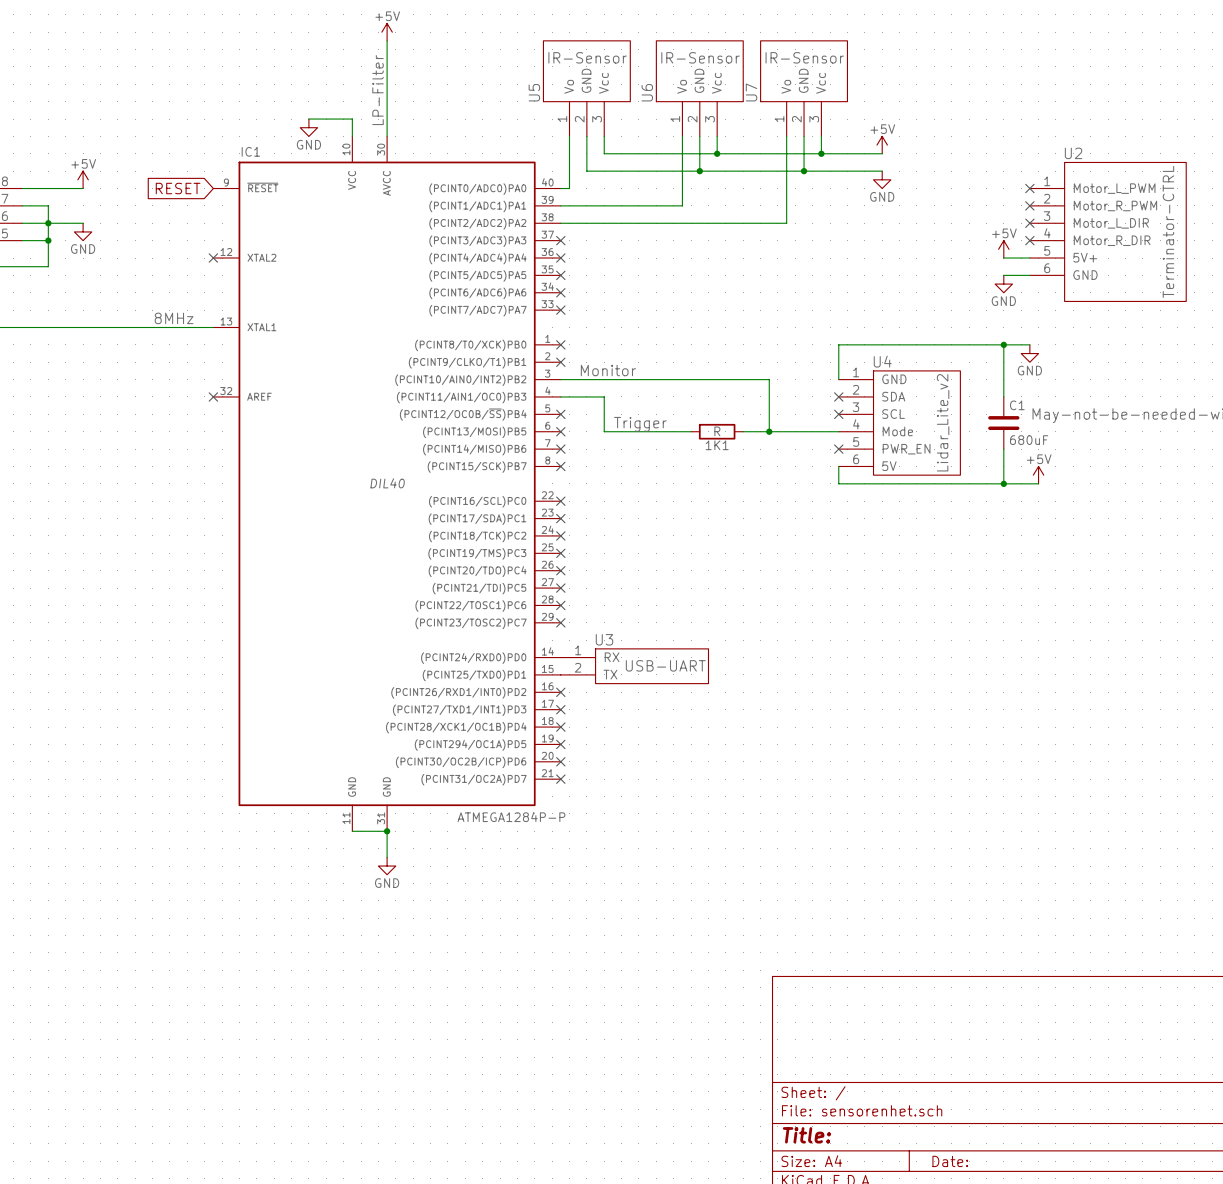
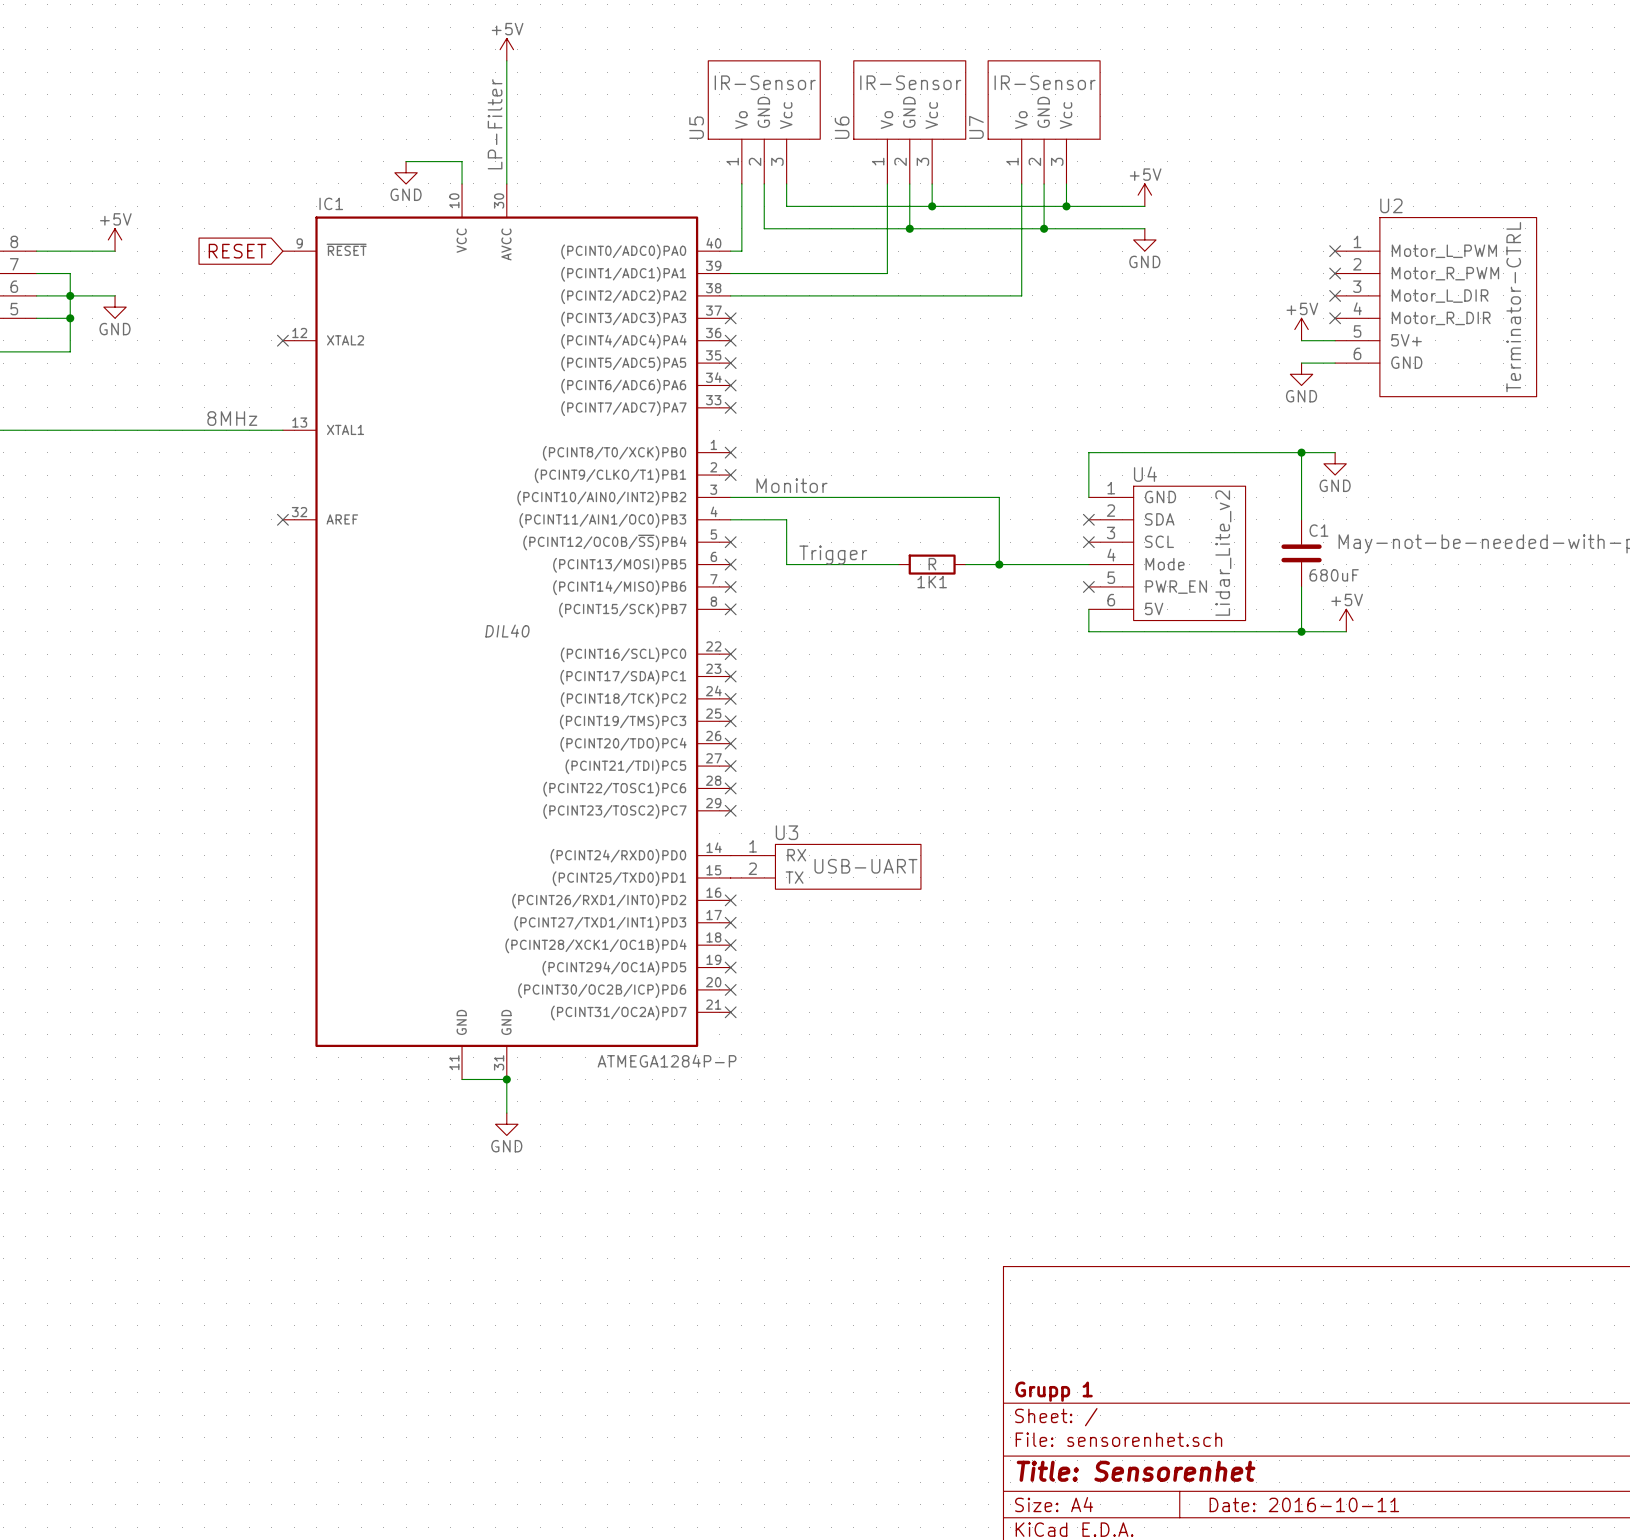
title block: none -> Grupp 1 (1054, 1391)
title block: Title: (806, 1135) -> Title: Sensorenhet (1136, 1471)
title block: Date: (950, 1161) -> Date: 2016-10-11 (1304, 1504)

